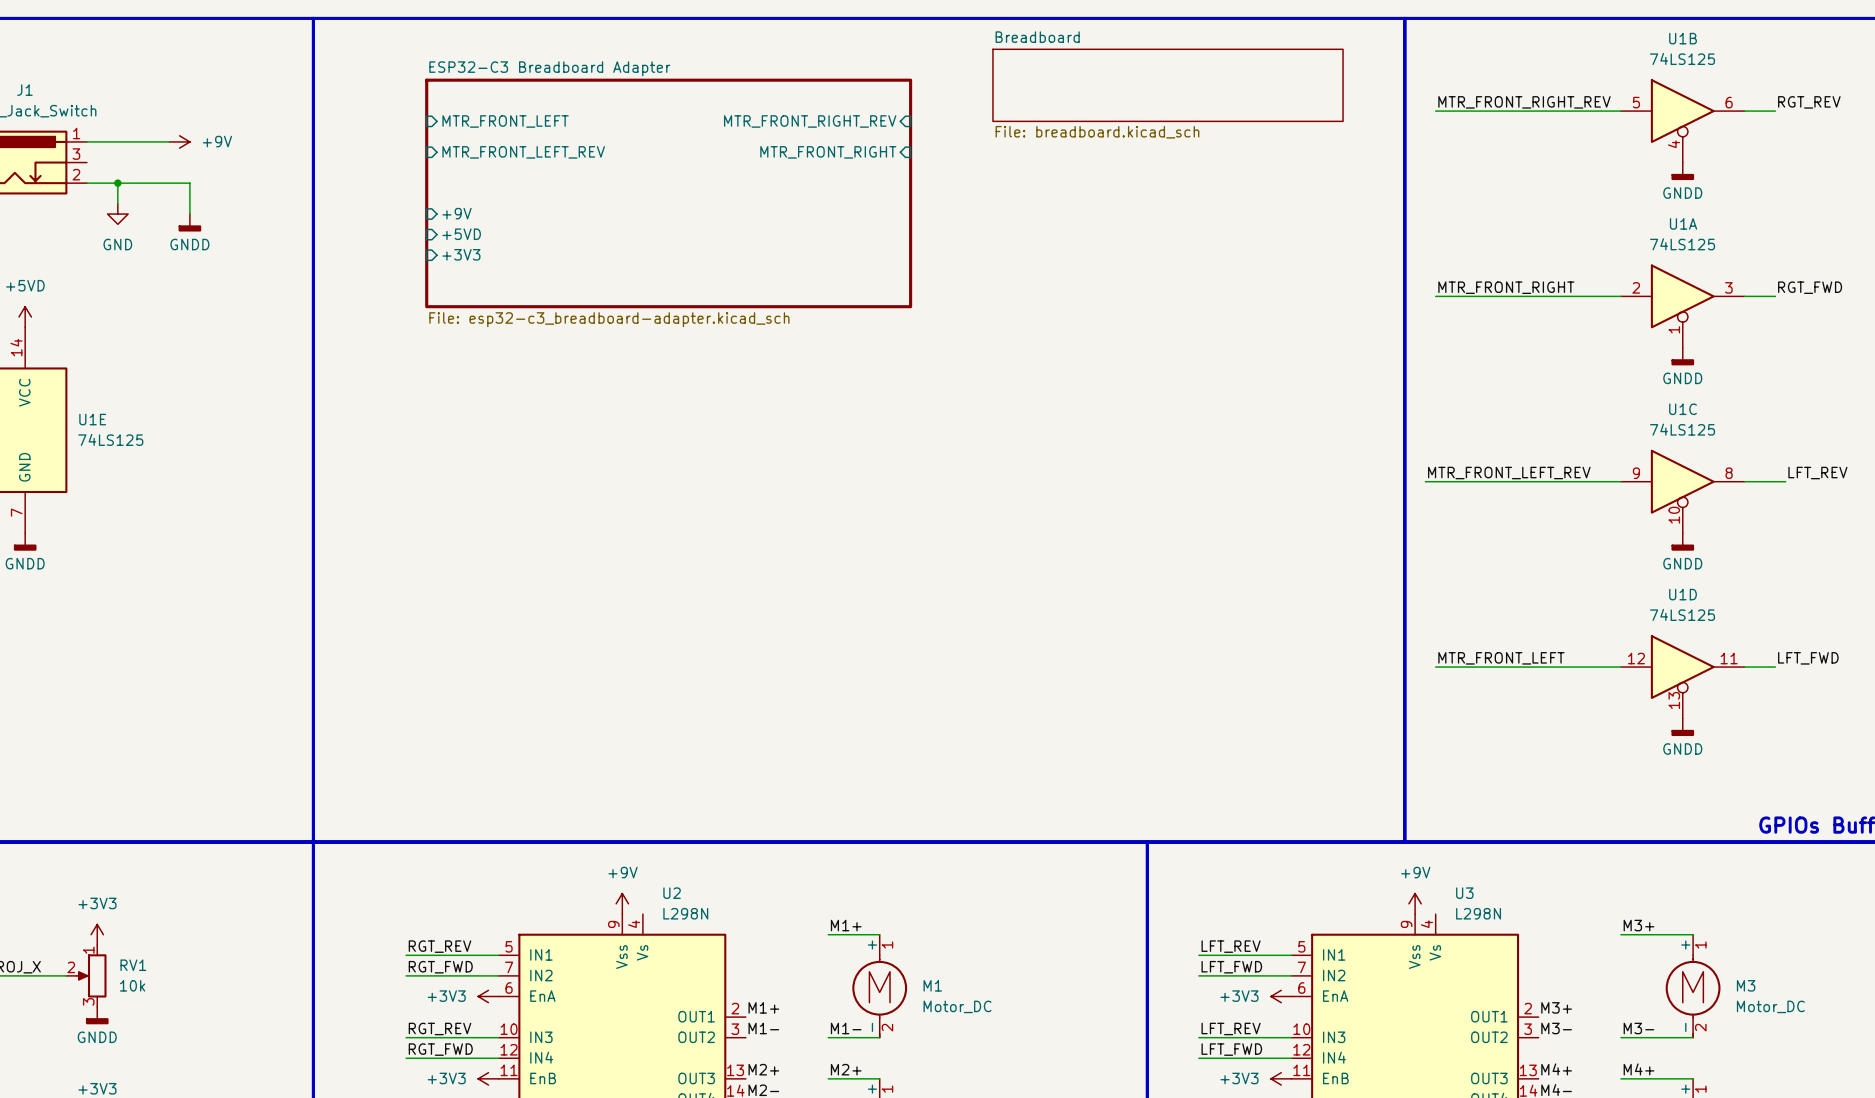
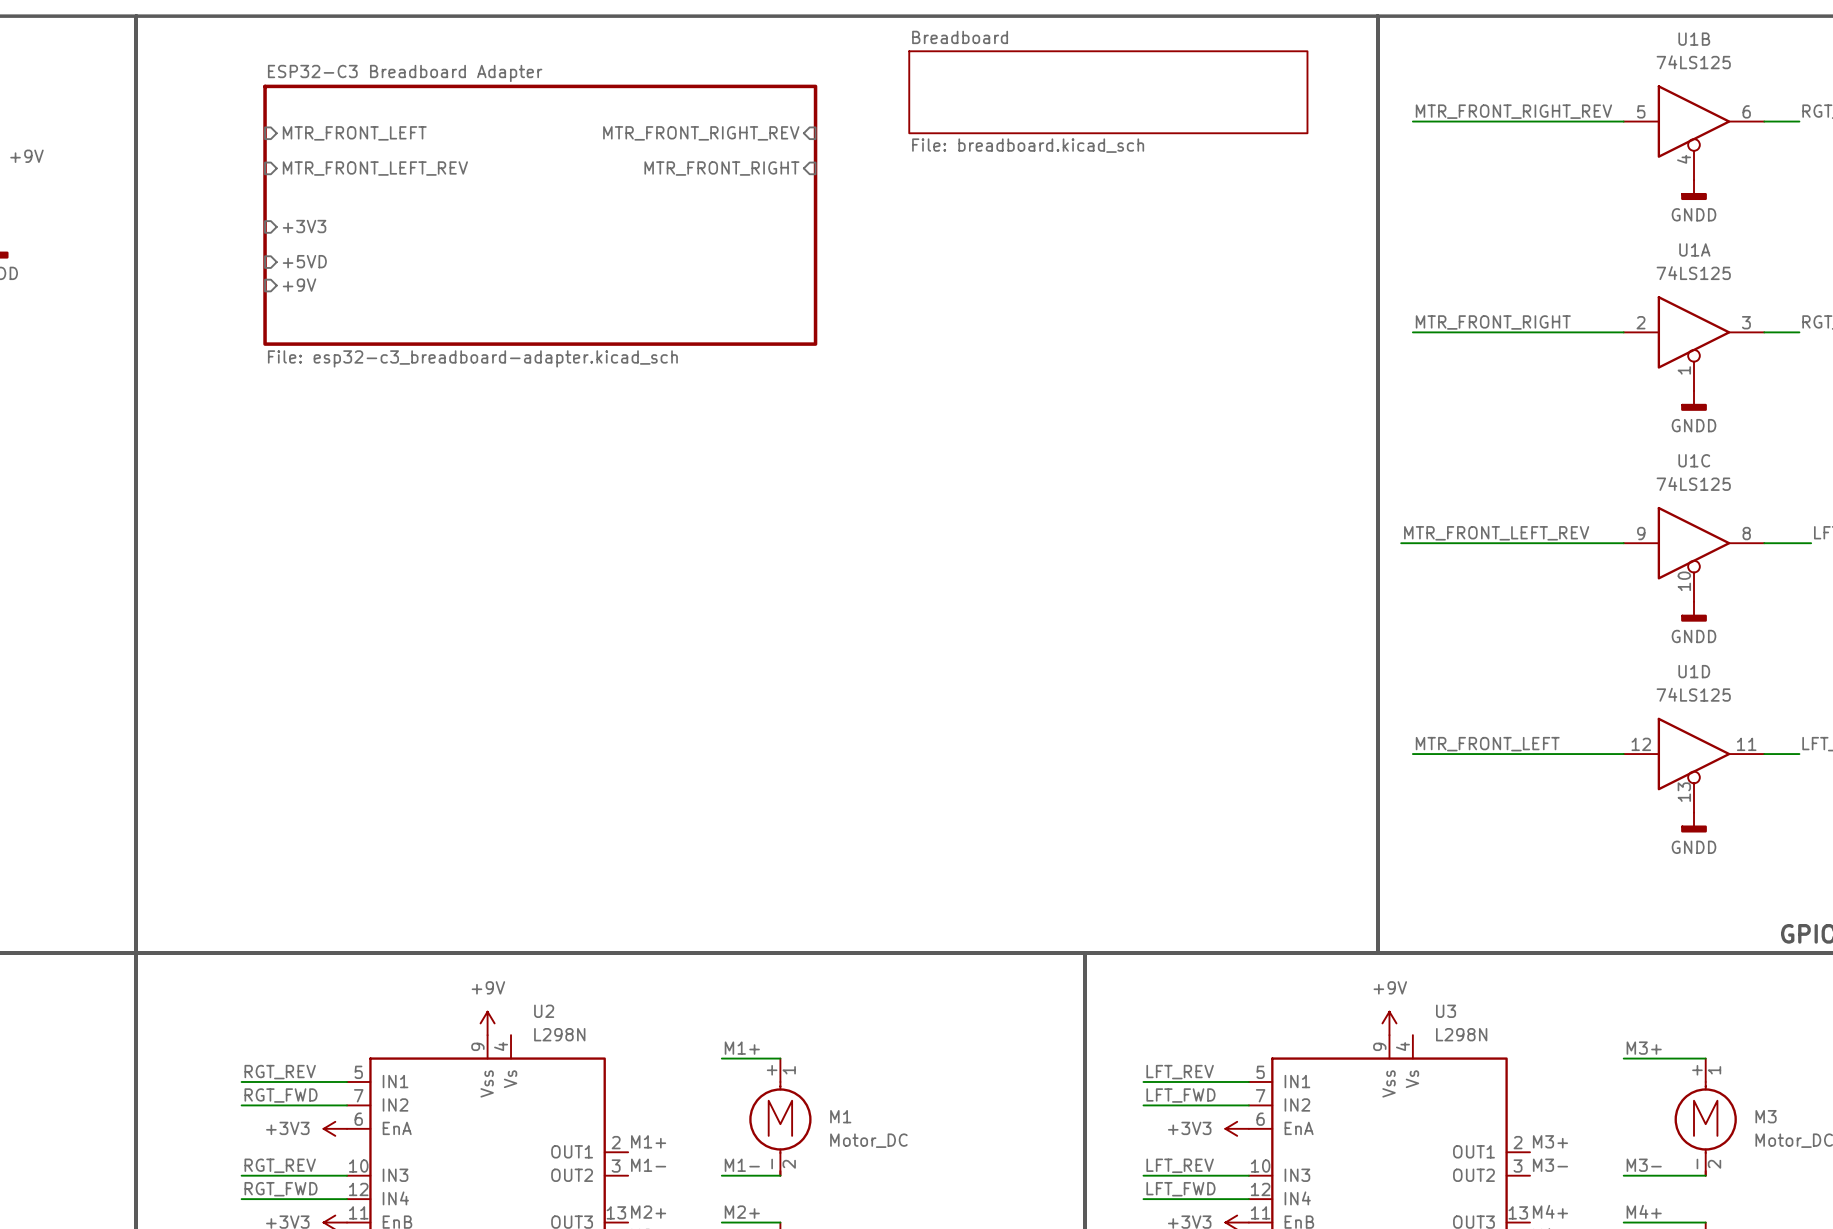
sheet pin: none -> +3V3 (304, 226)
sheet pin: +9V (457, 213) -> none
sheet pin: +3V3 (461, 254) -> +9V (299, 285)

